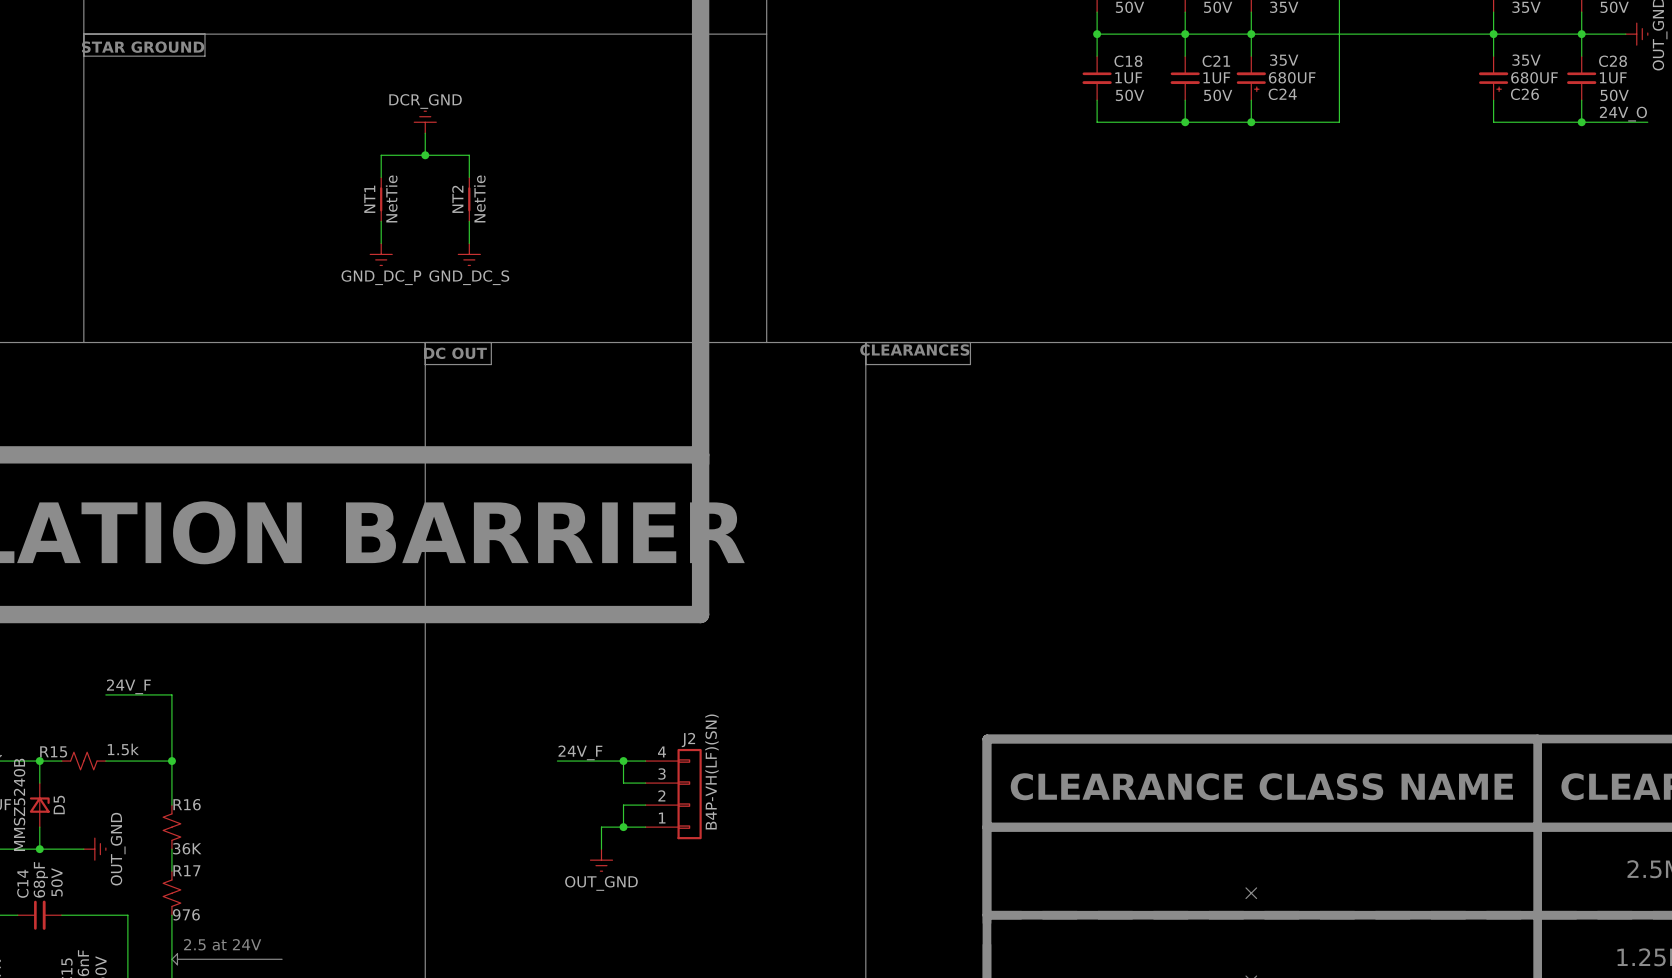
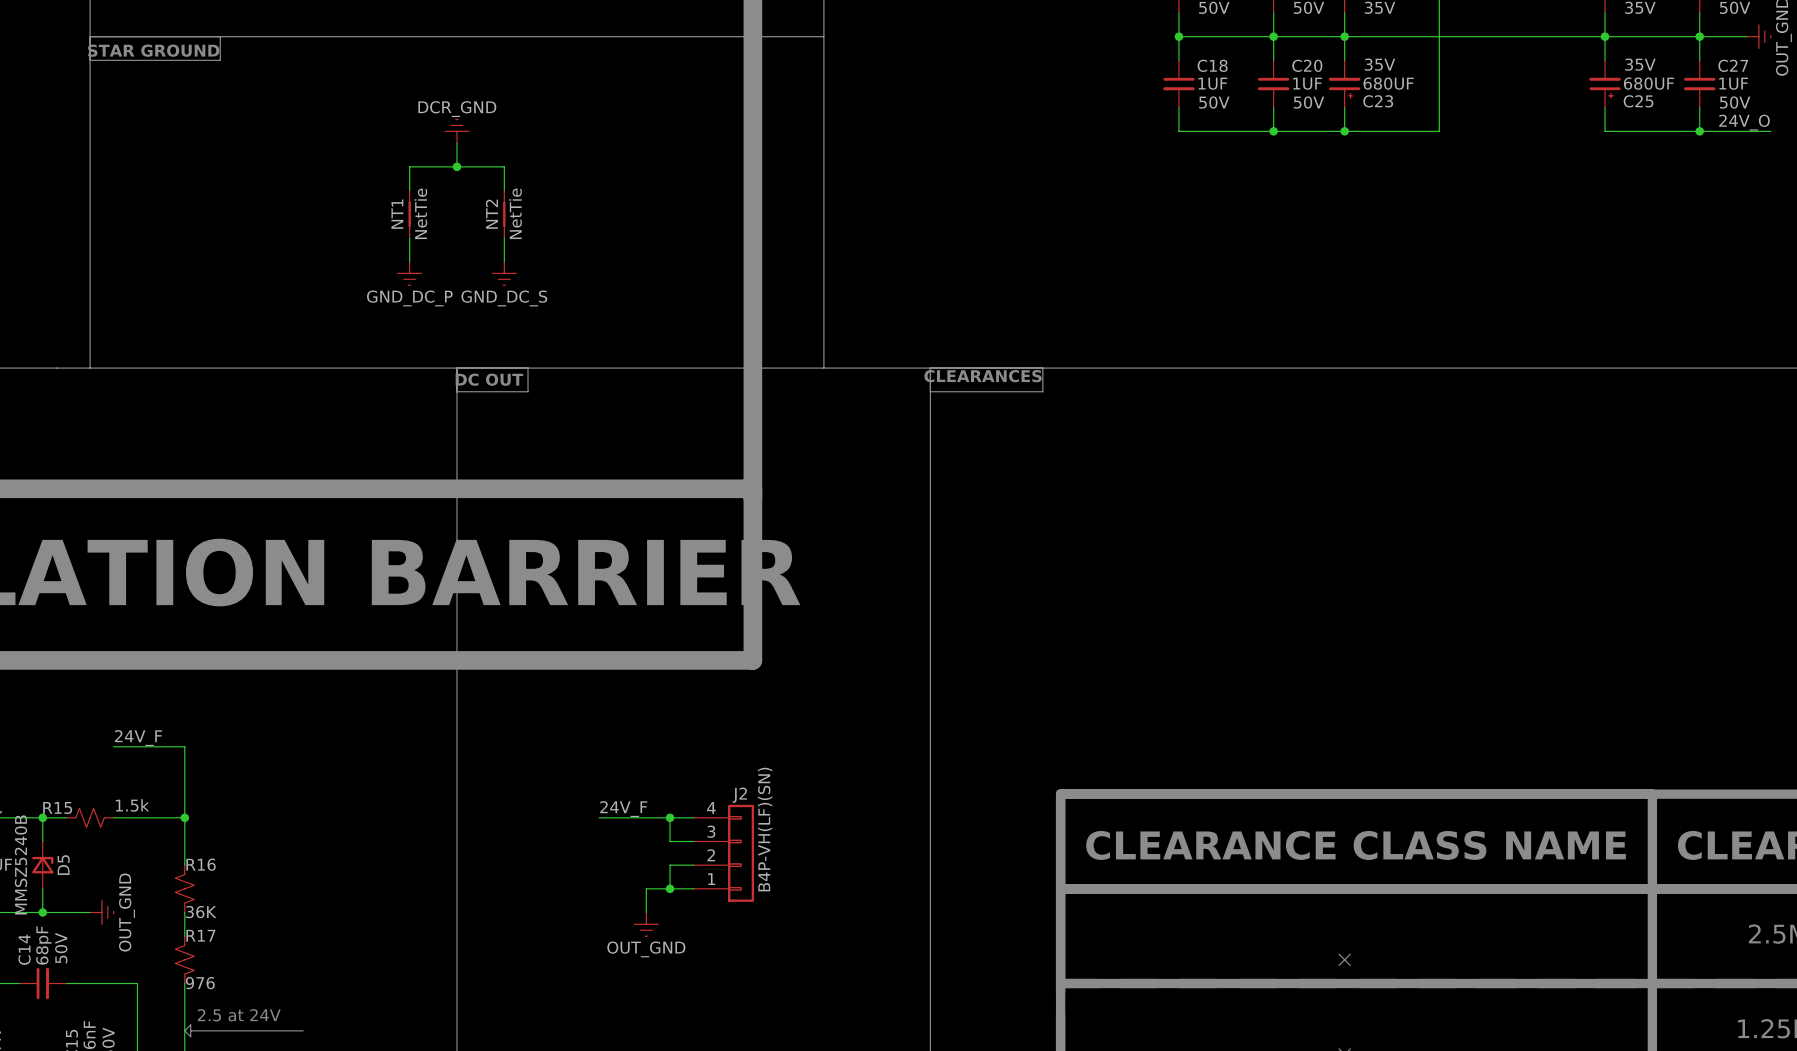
C21 name: C21 (1216, 61) -> C20 (1307, 65)
C28 name: C28 (1613, 61) -> C27 (1733, 65)
C24 name: C24 (1282, 94) -> C23 (1378, 101)
C26 name: C26 (1524, 94) -> C25 (1638, 101)

